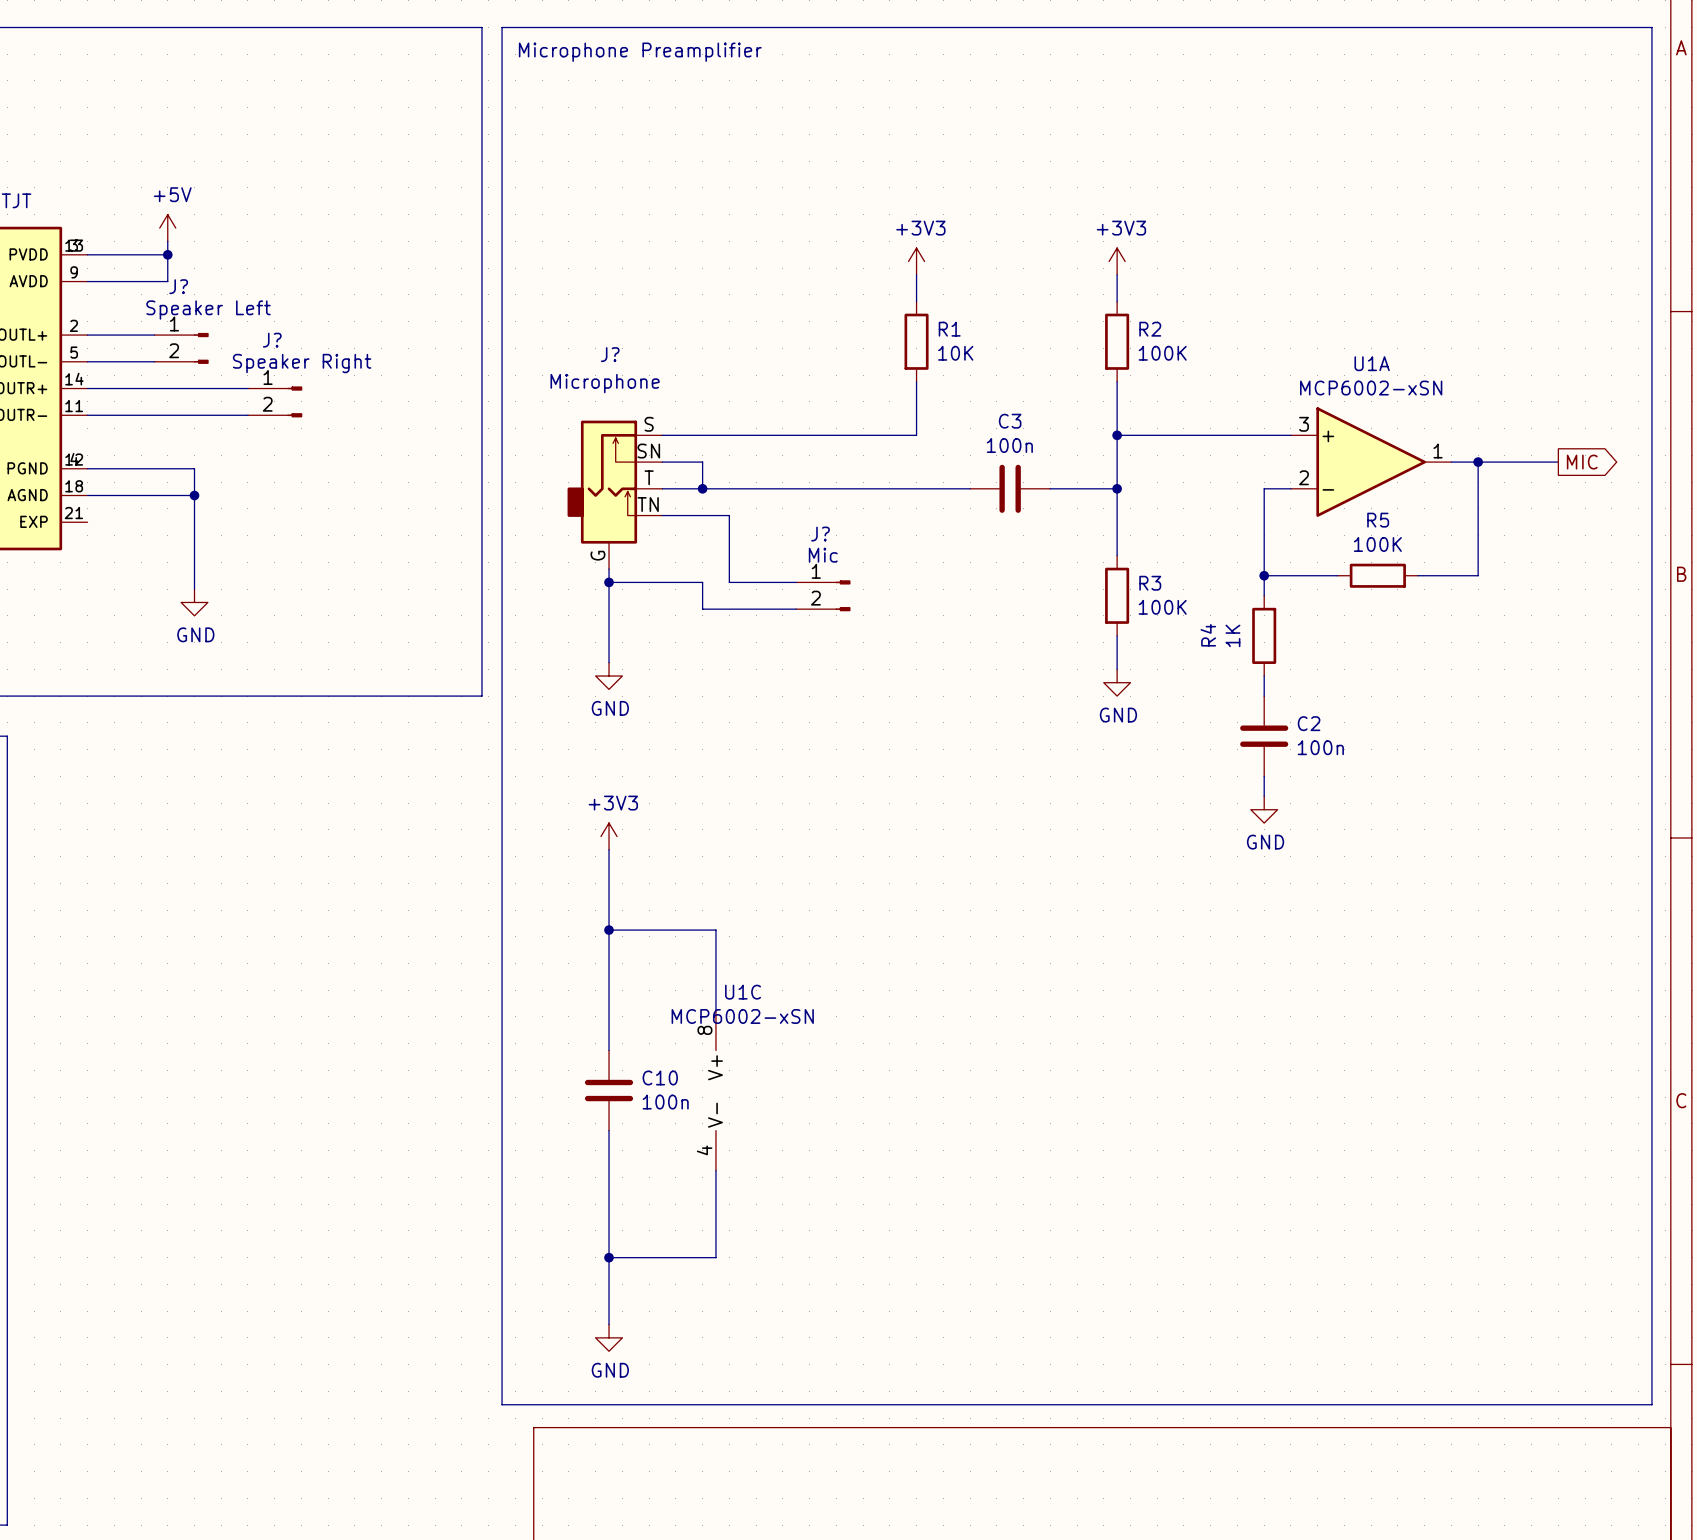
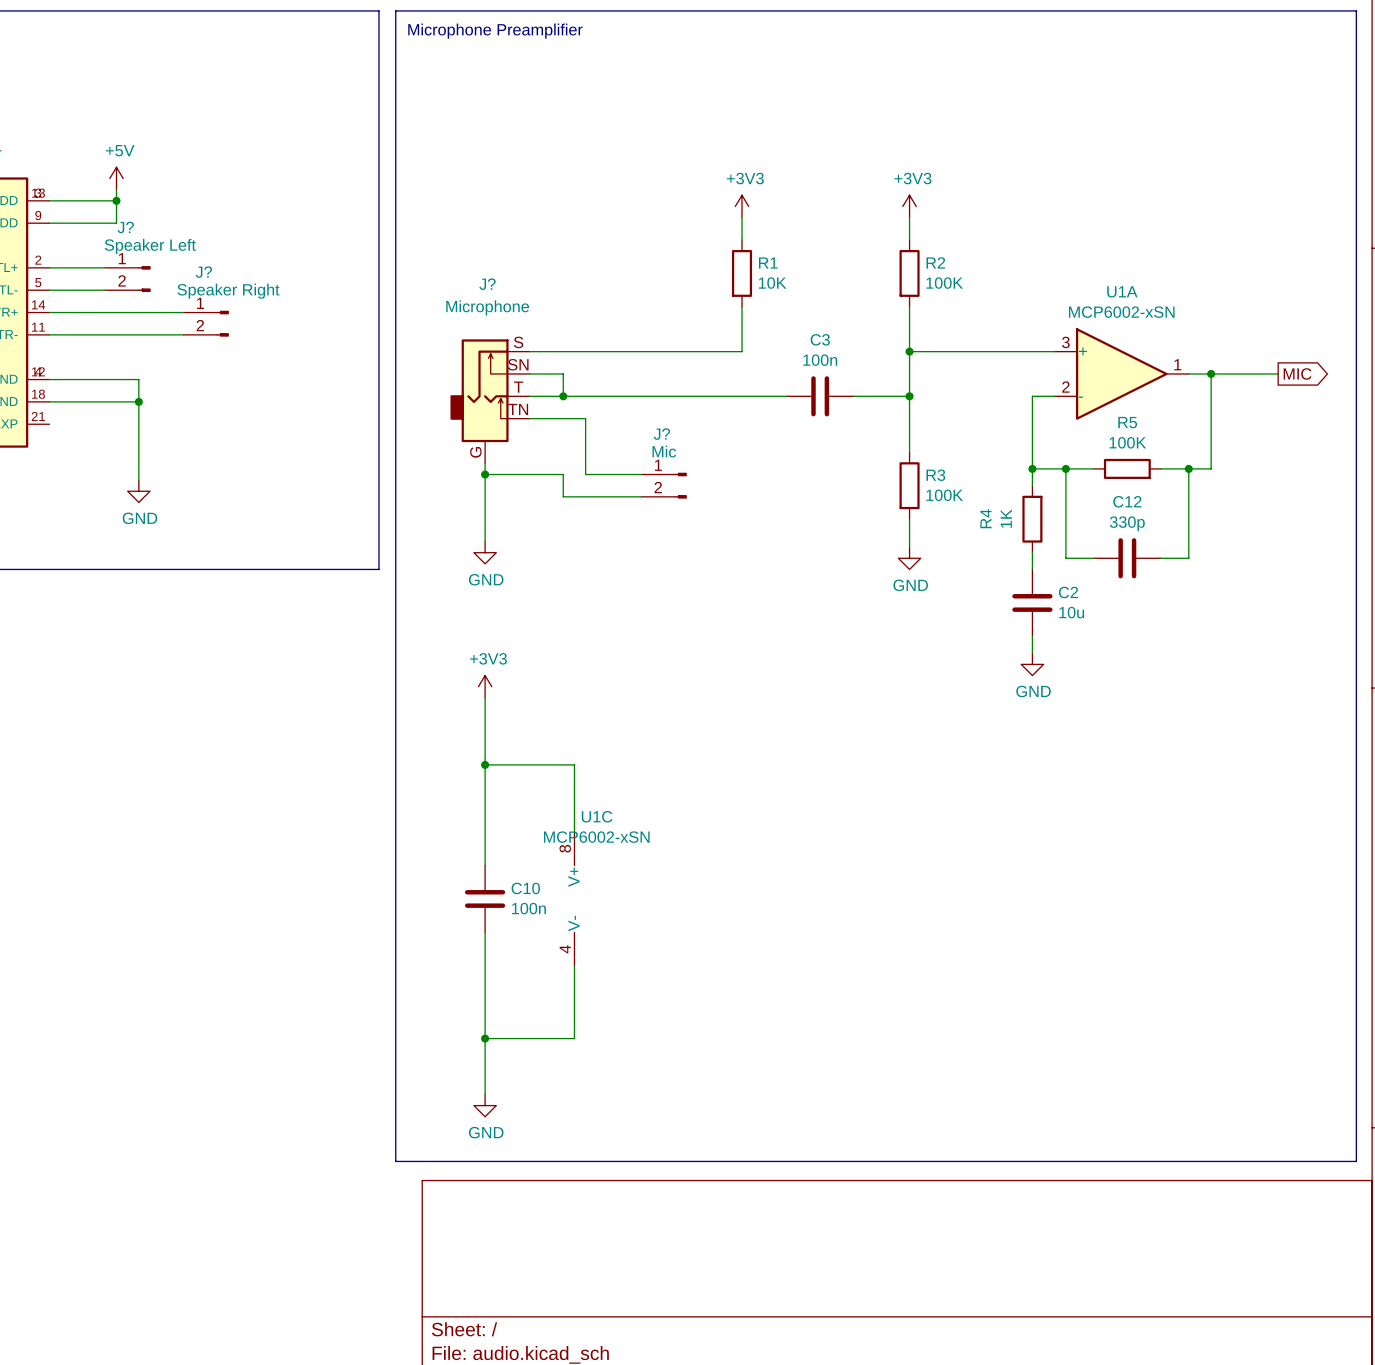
wire: none -> (1065, 468) (1065, 558) (1093, 558)
junction: none -> (1065, 468)
wire: none -> (1188, 468) (1188, 558) (1160, 558)
junction: none -> (1188, 468)
C12: none -> 330p (1127, 558)
C2 value: 100n (1320, 747) -> 10u (1071, 612)

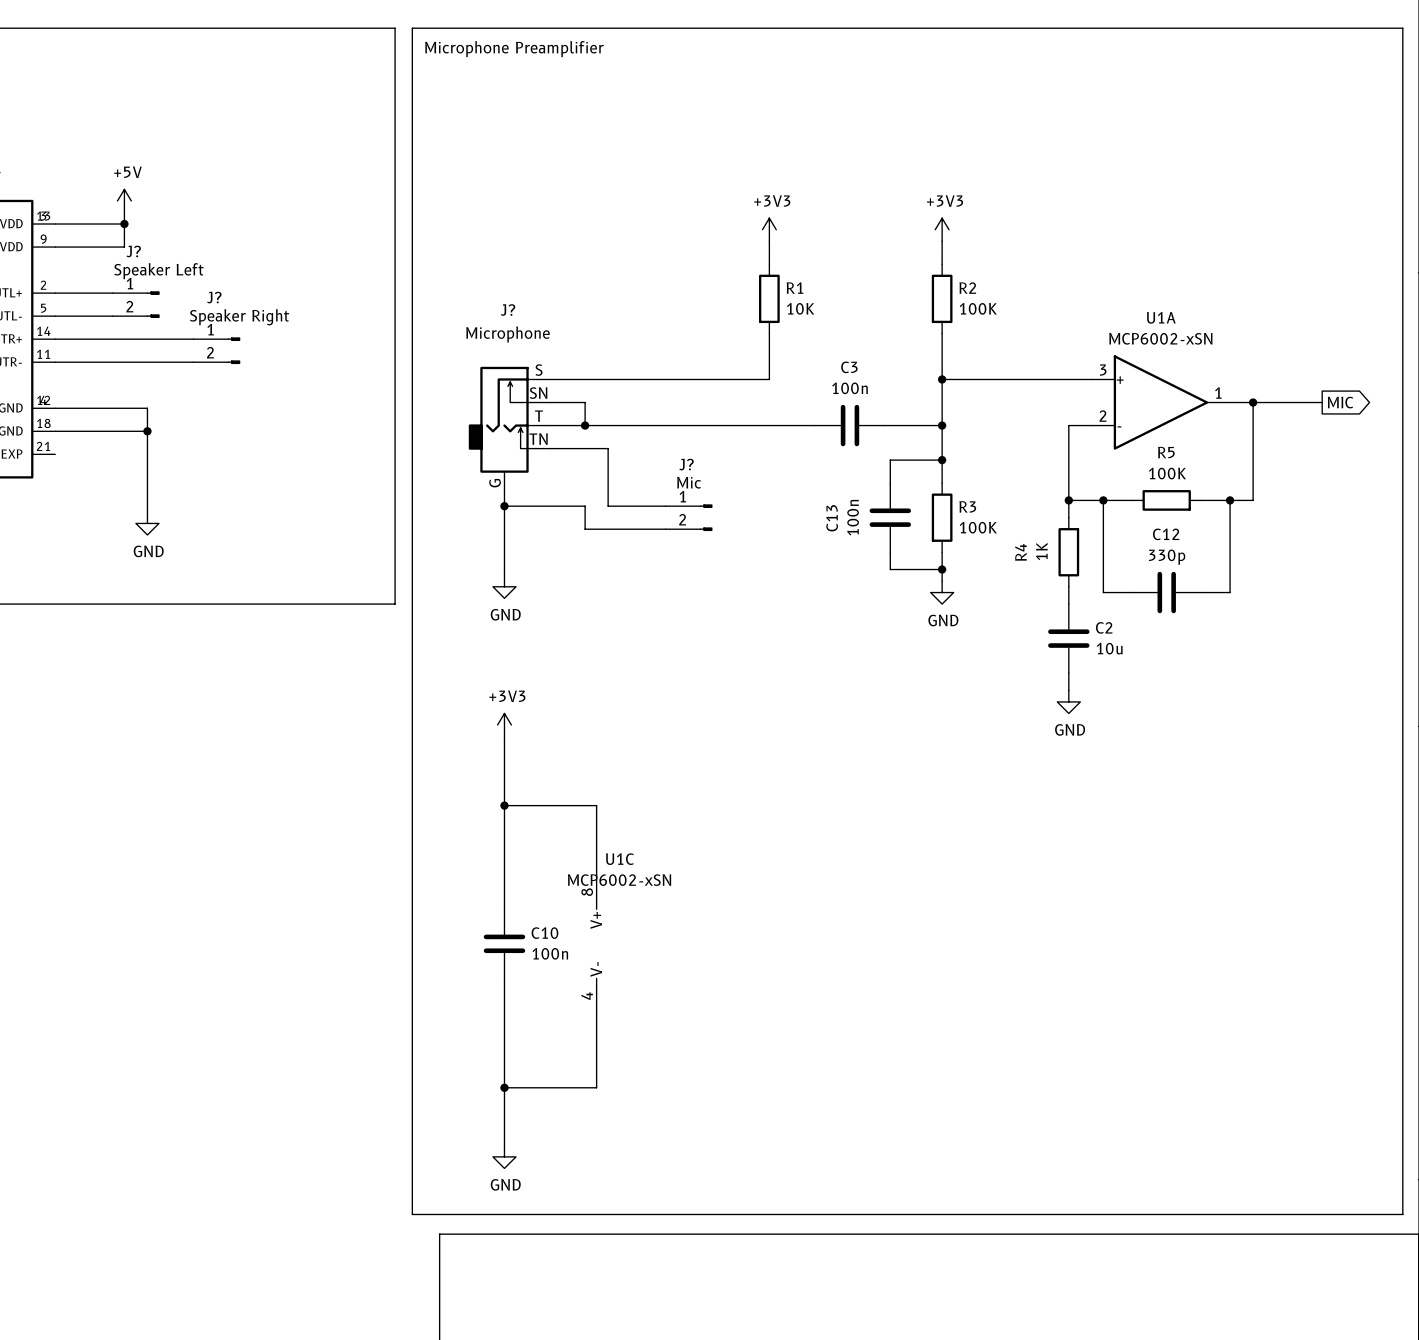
wire: none -> (942, 460) (890, 460) (890, 483)
junction: none -> (942, 460)
C13: none -> 100n (890, 517)
wire: none -> (890, 552) (890, 569) (942, 569)
junction: none -> (942, 569)

